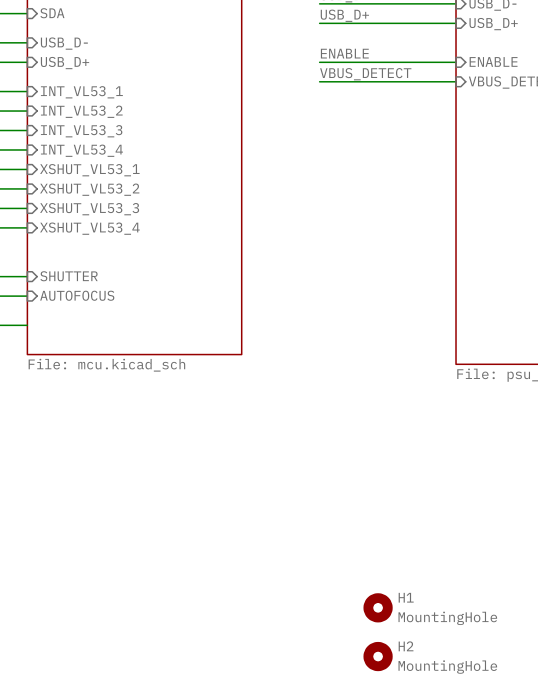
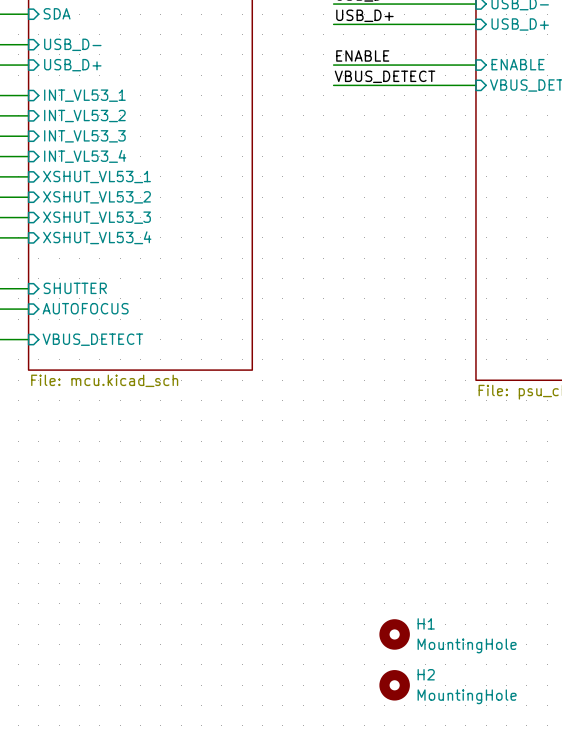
sheet pin: none -> VBUS_DETECT (92, 339)

